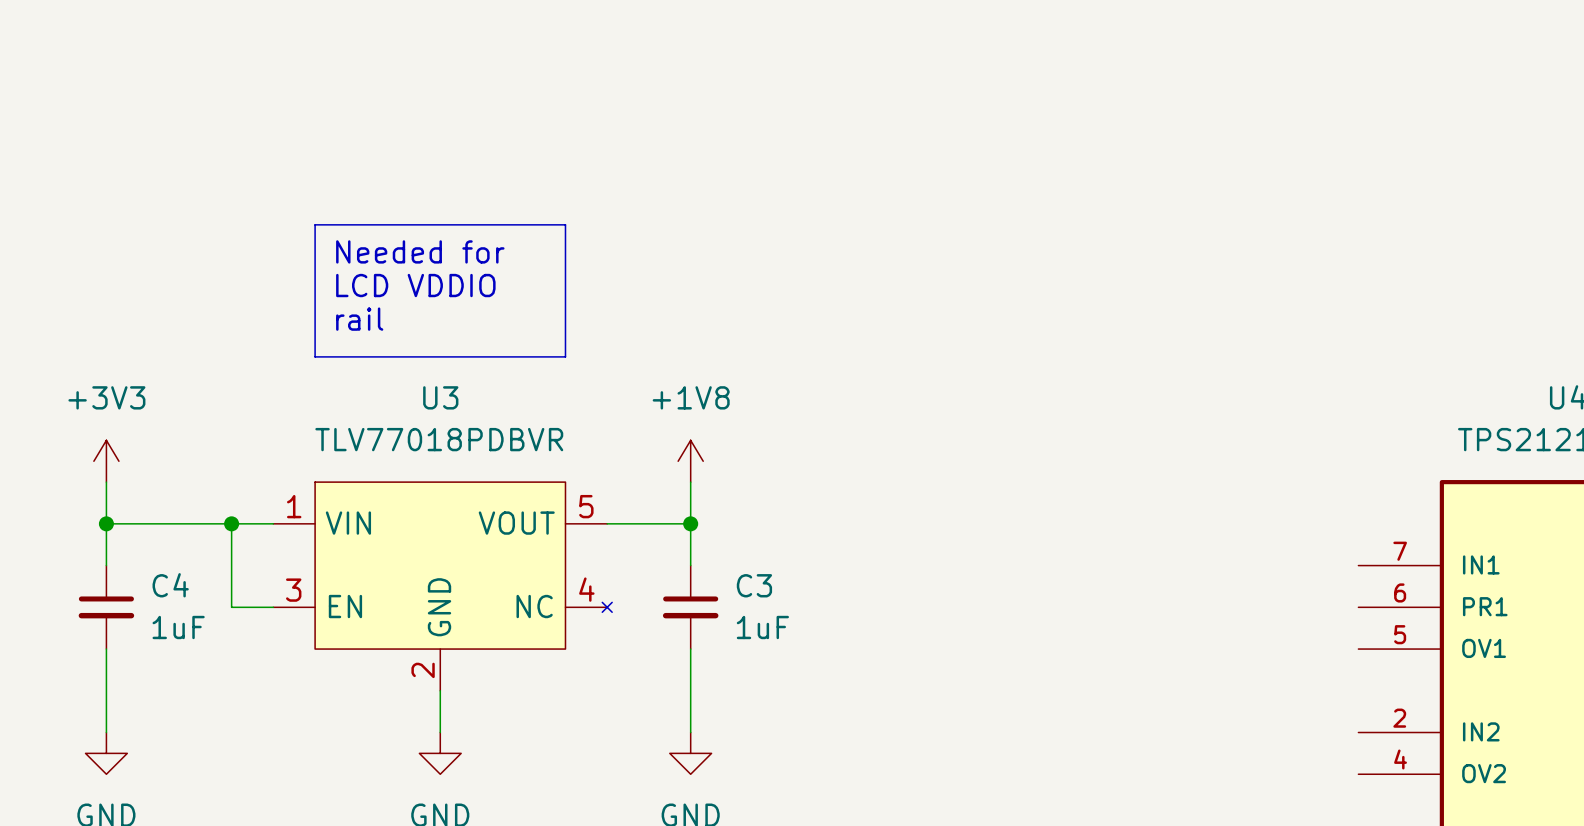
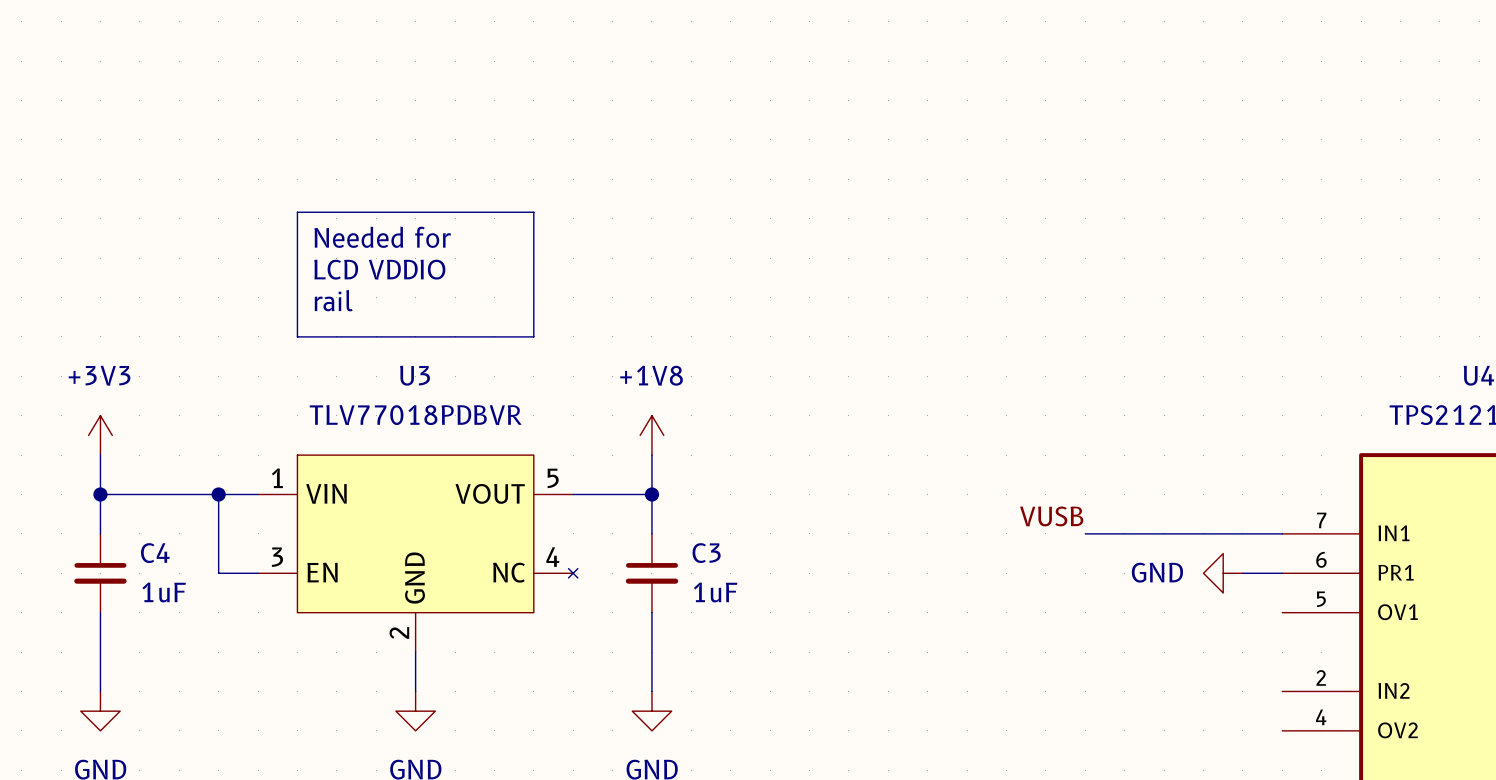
label: none -> VUSB (1051, 516)
wire: none -> (1085, 533) (1282, 533)
power symbol: none -> GND (1223, 573)
wire: none -> (1242, 573) (1282, 573)

